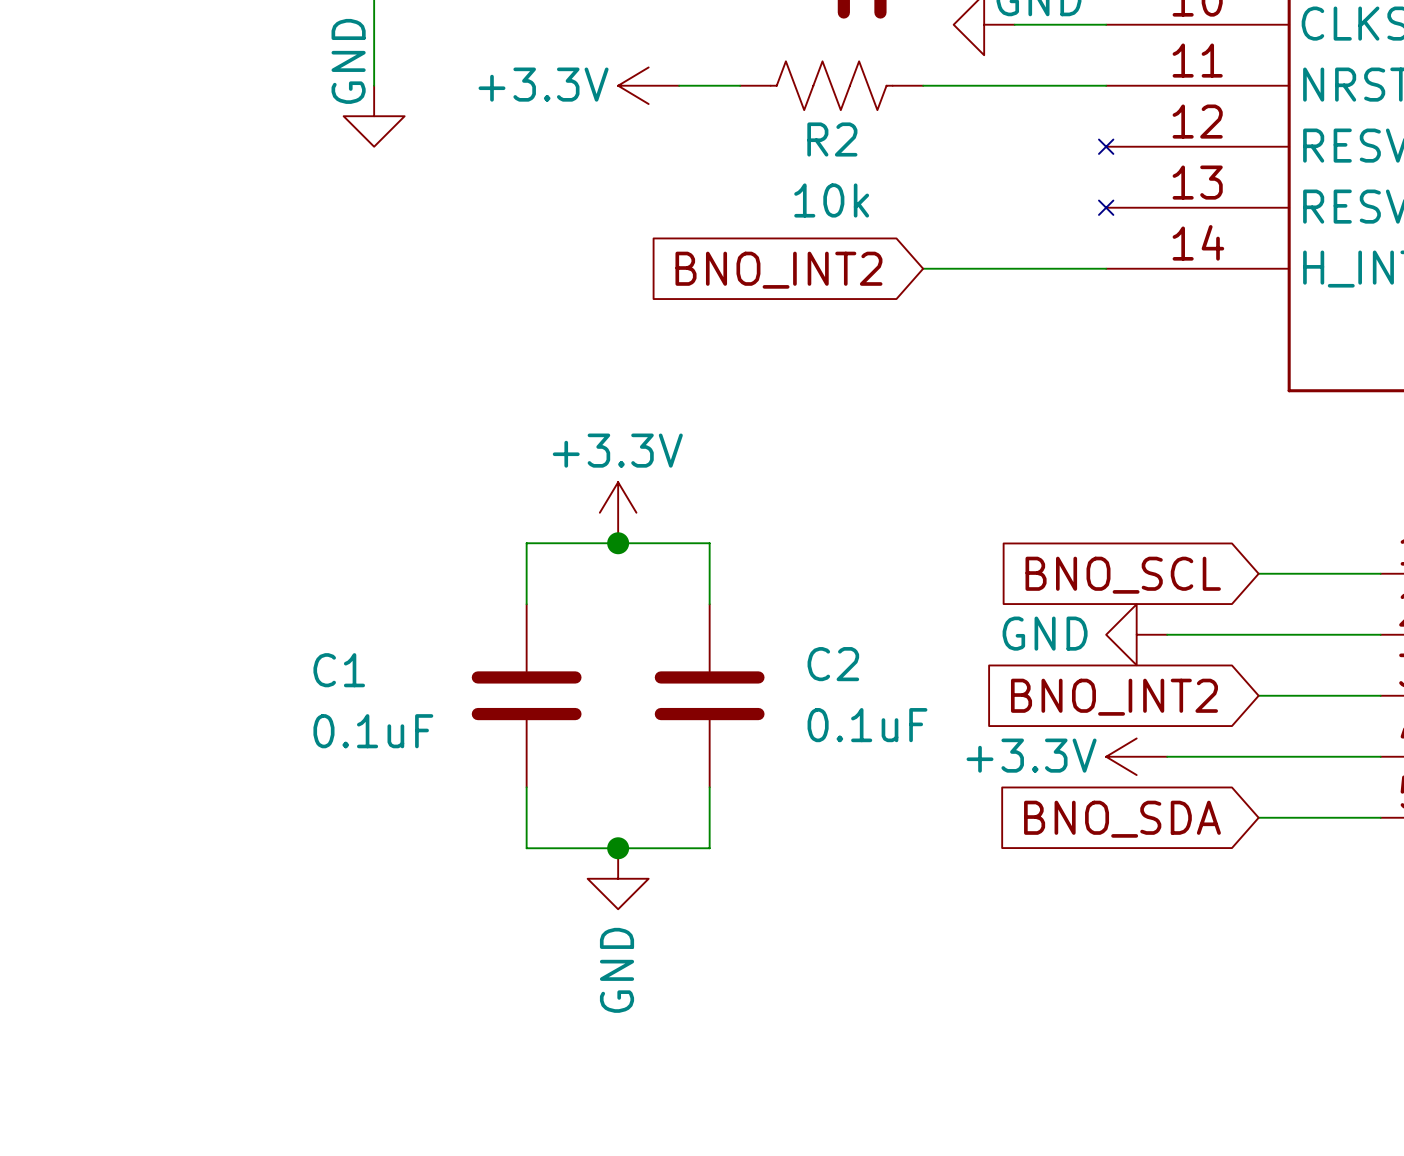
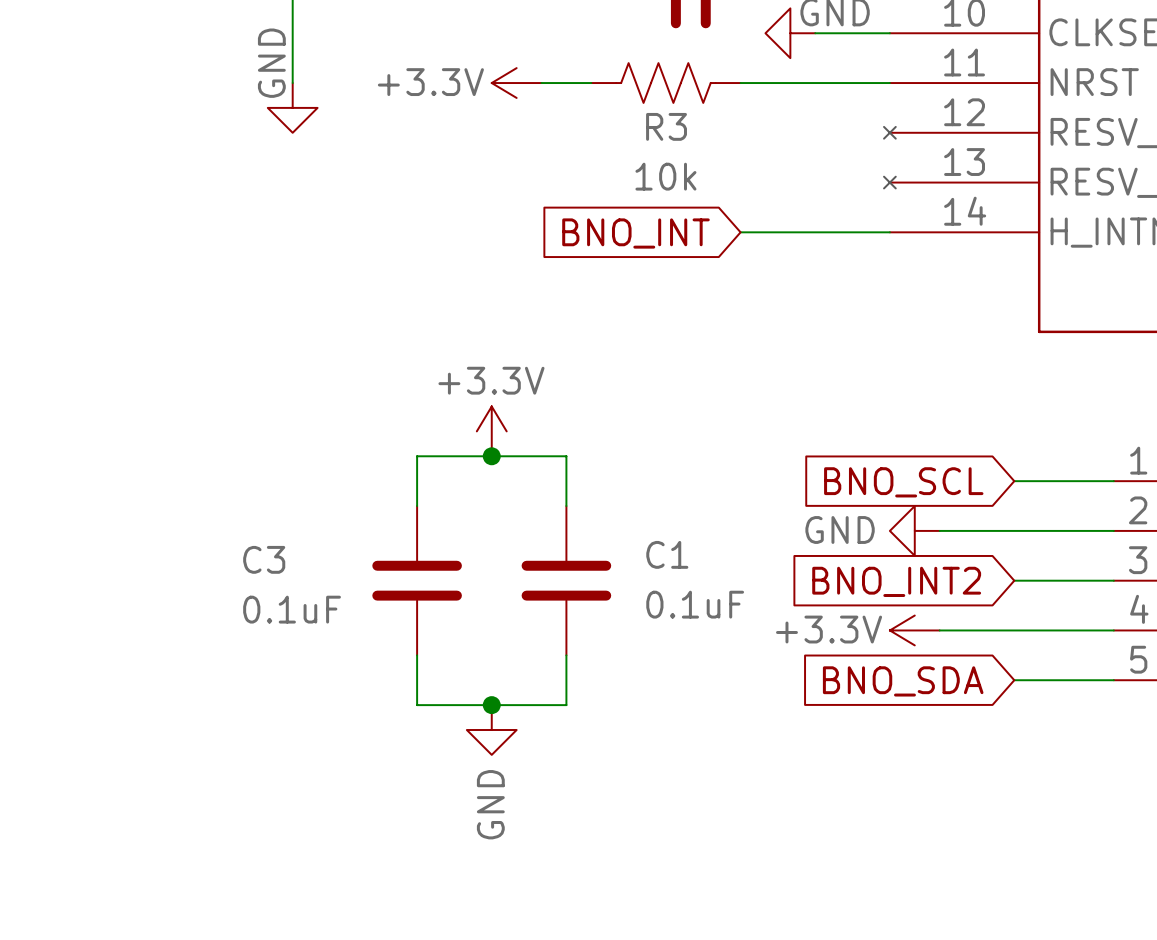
R2 name: R2 (832, 139) -> R3 (666, 126)
global label: BNO_INT2 (778, 270) -> BNO_INT (635, 233)
C2 name: C2 (833, 664) -> C1 (667, 554)
C1 name: C1 (339, 670) -> C3 (264, 559)

